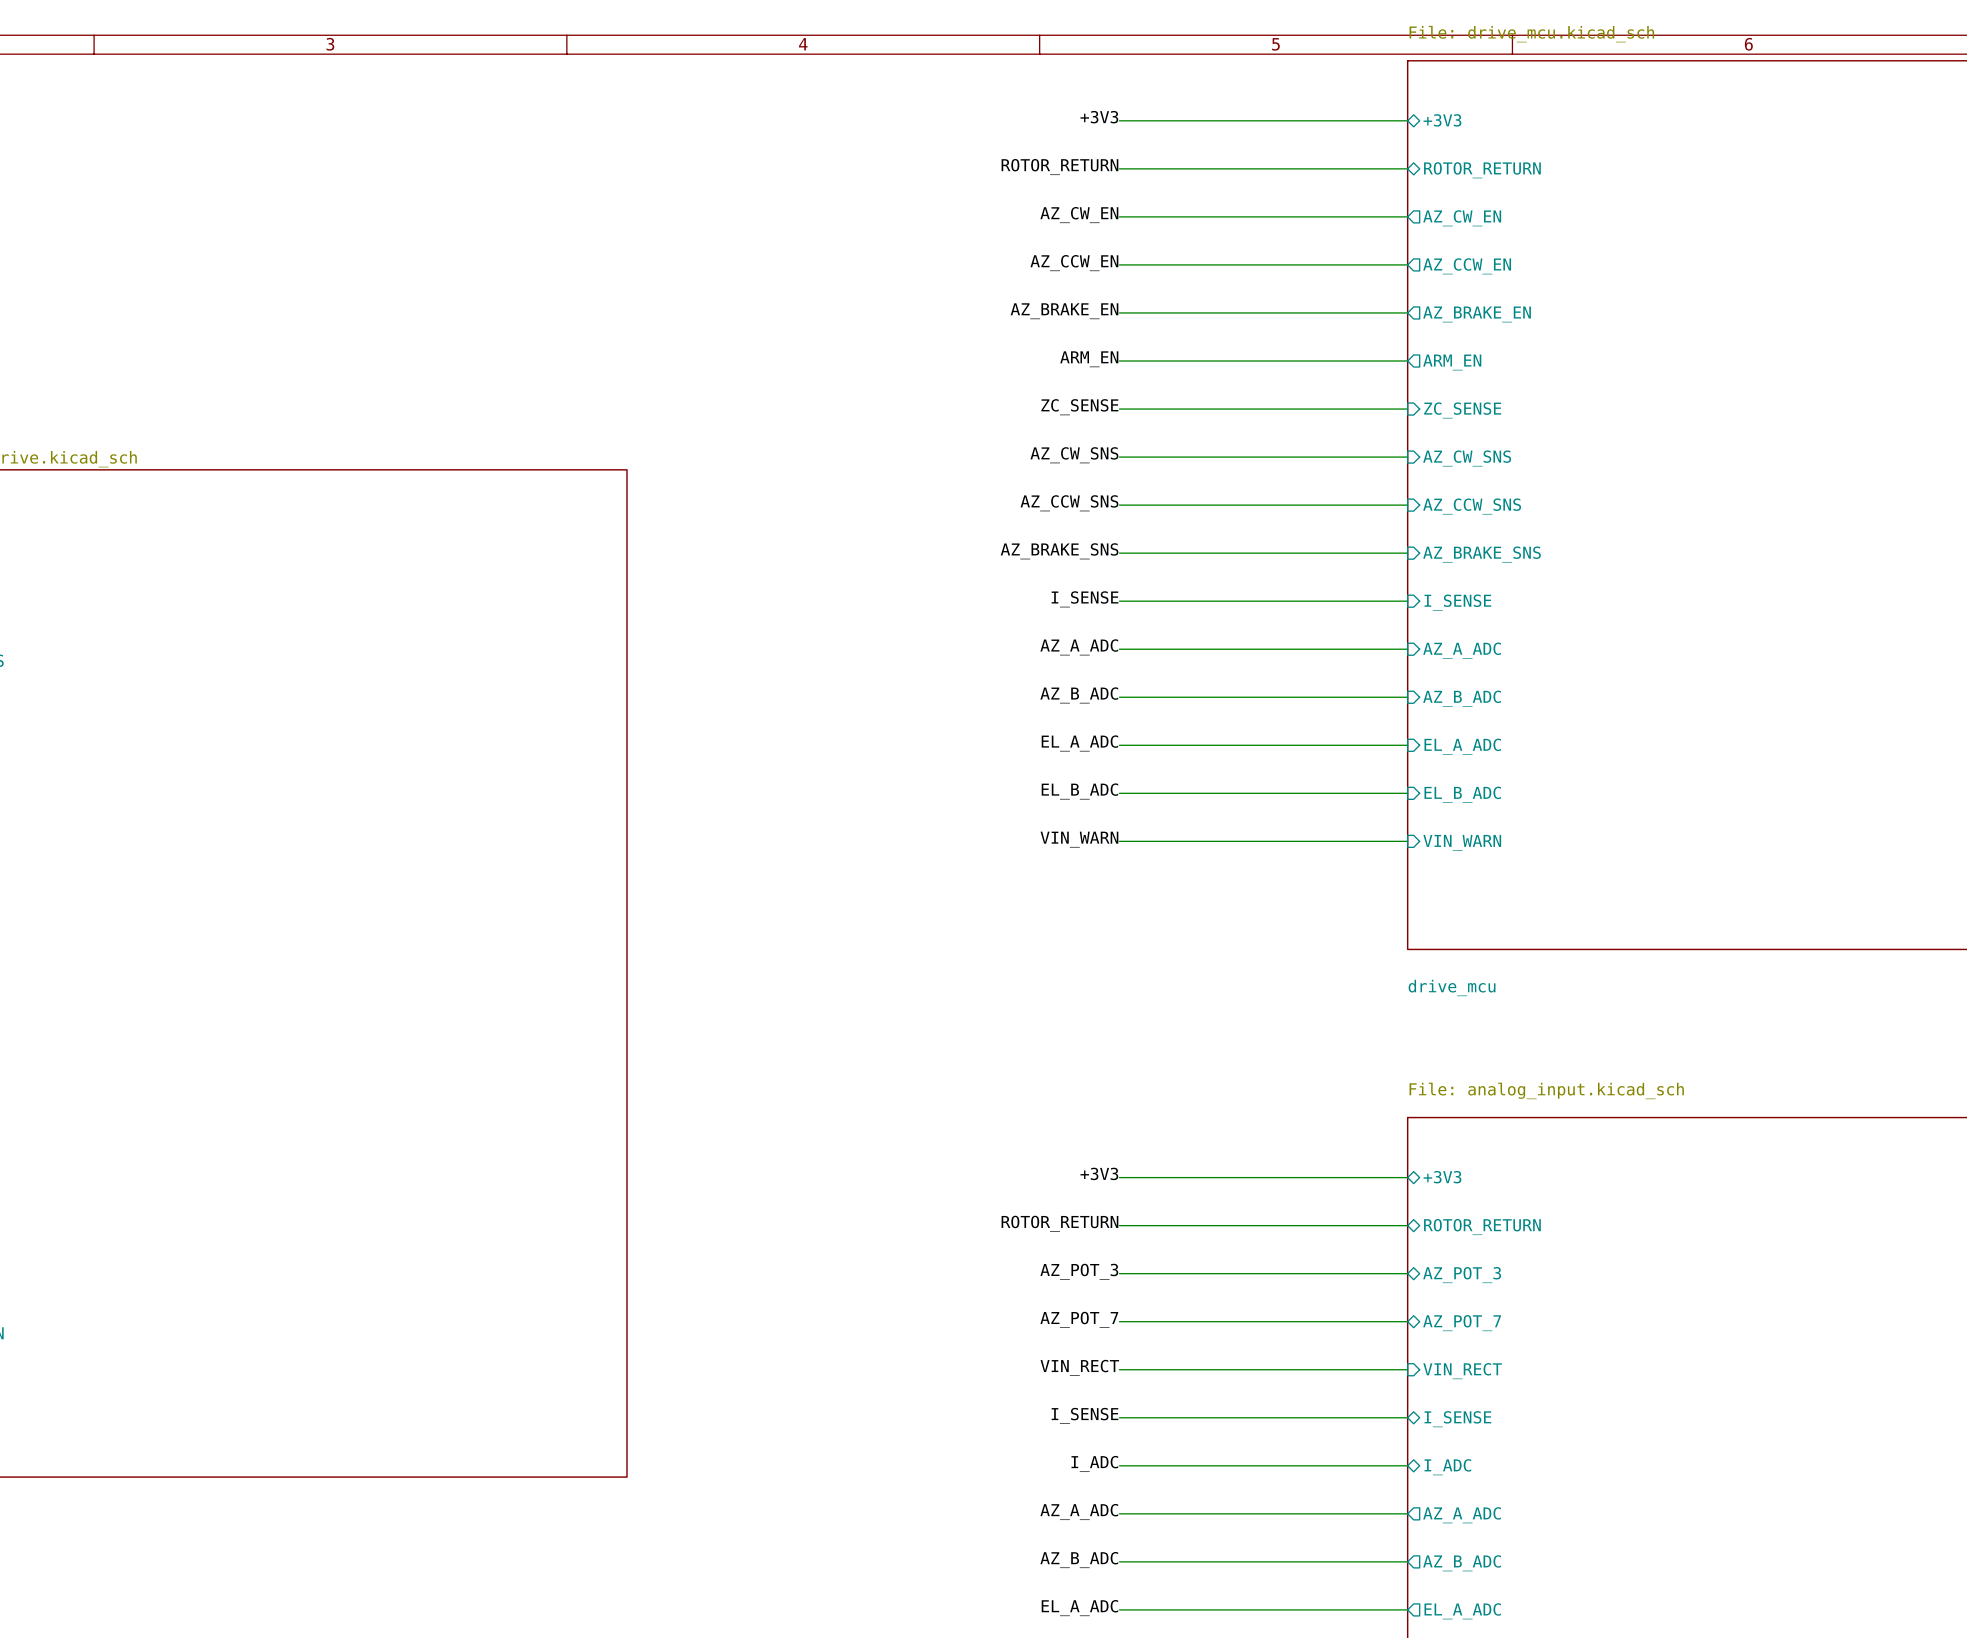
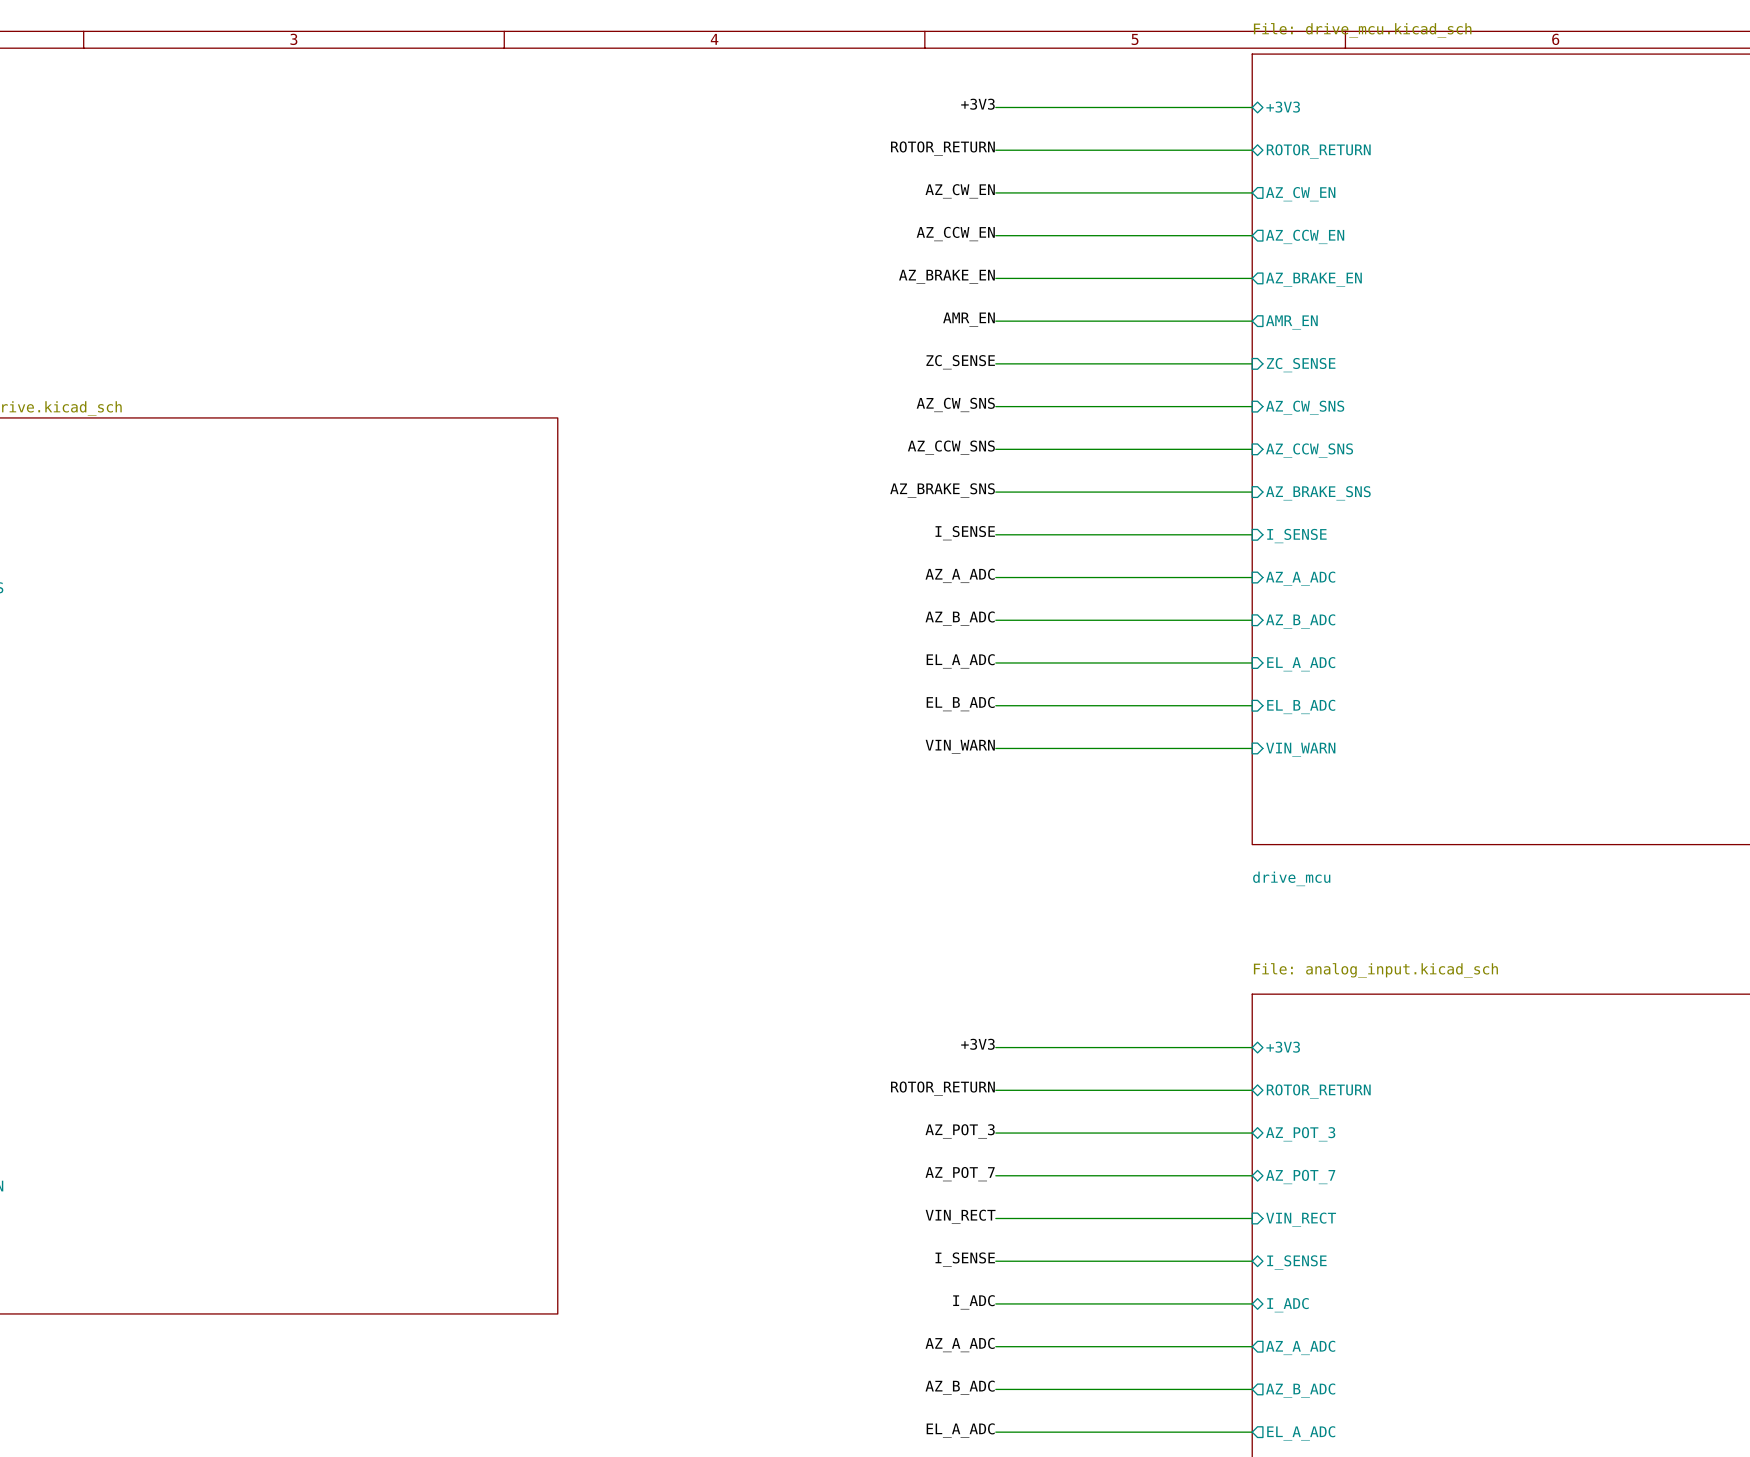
label: ARM_EN (1089, 359) -> AMR_EN (969, 319)
sheet pin: ARM_EN (1452, 362) -> AMR_EN (1291, 322)

